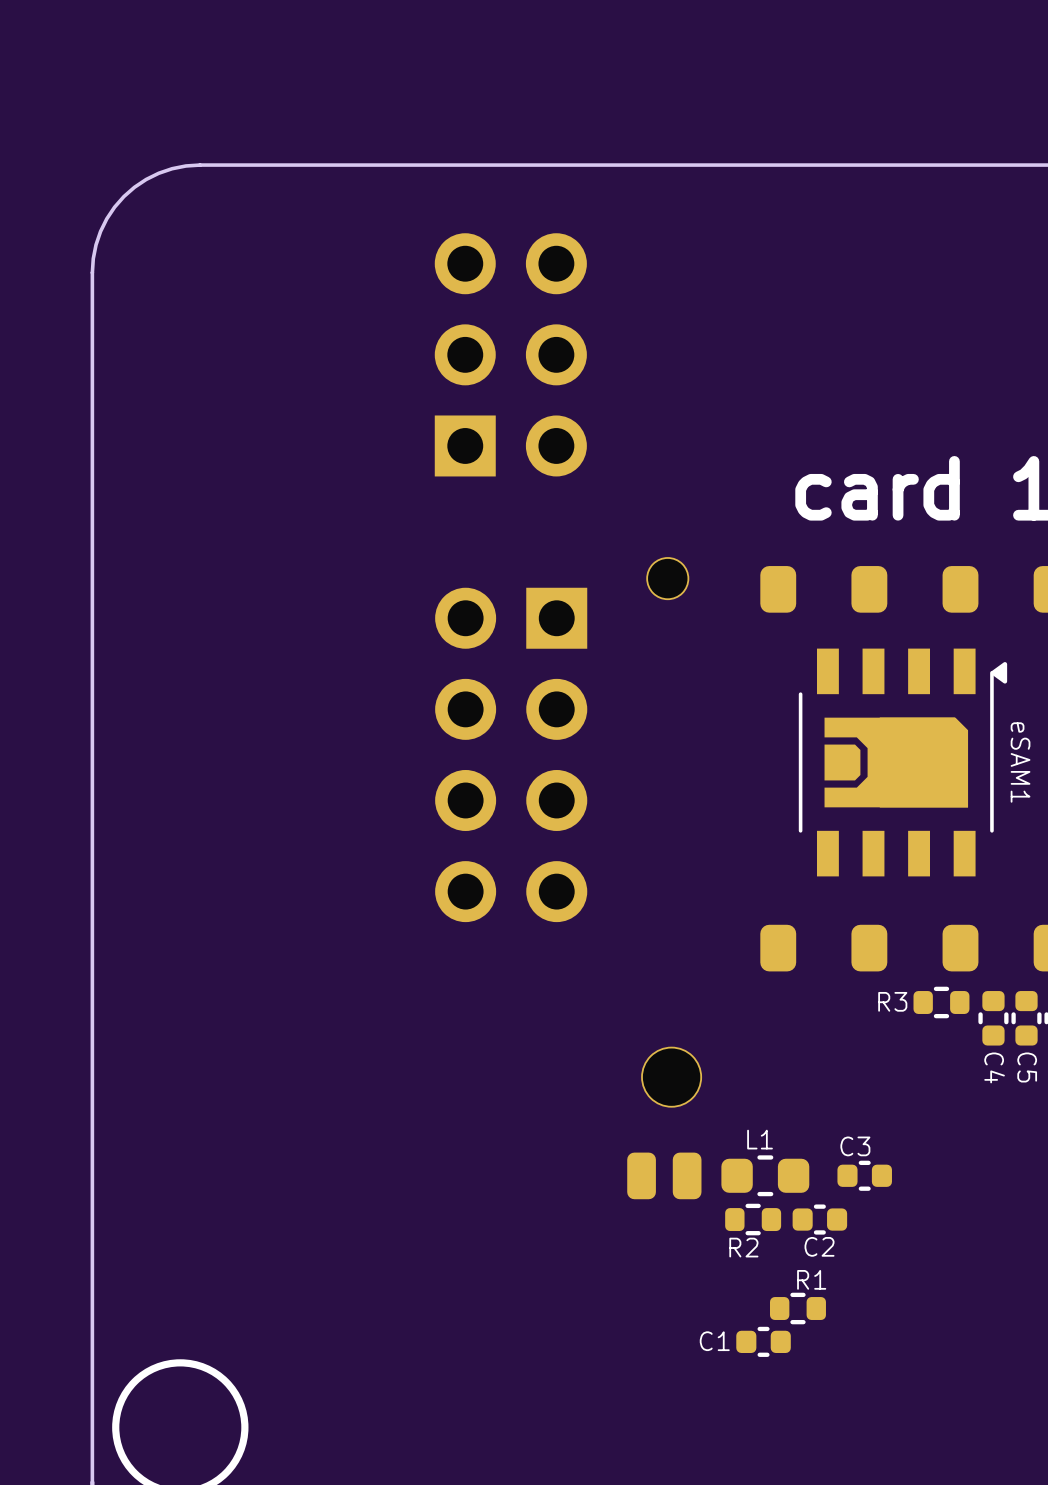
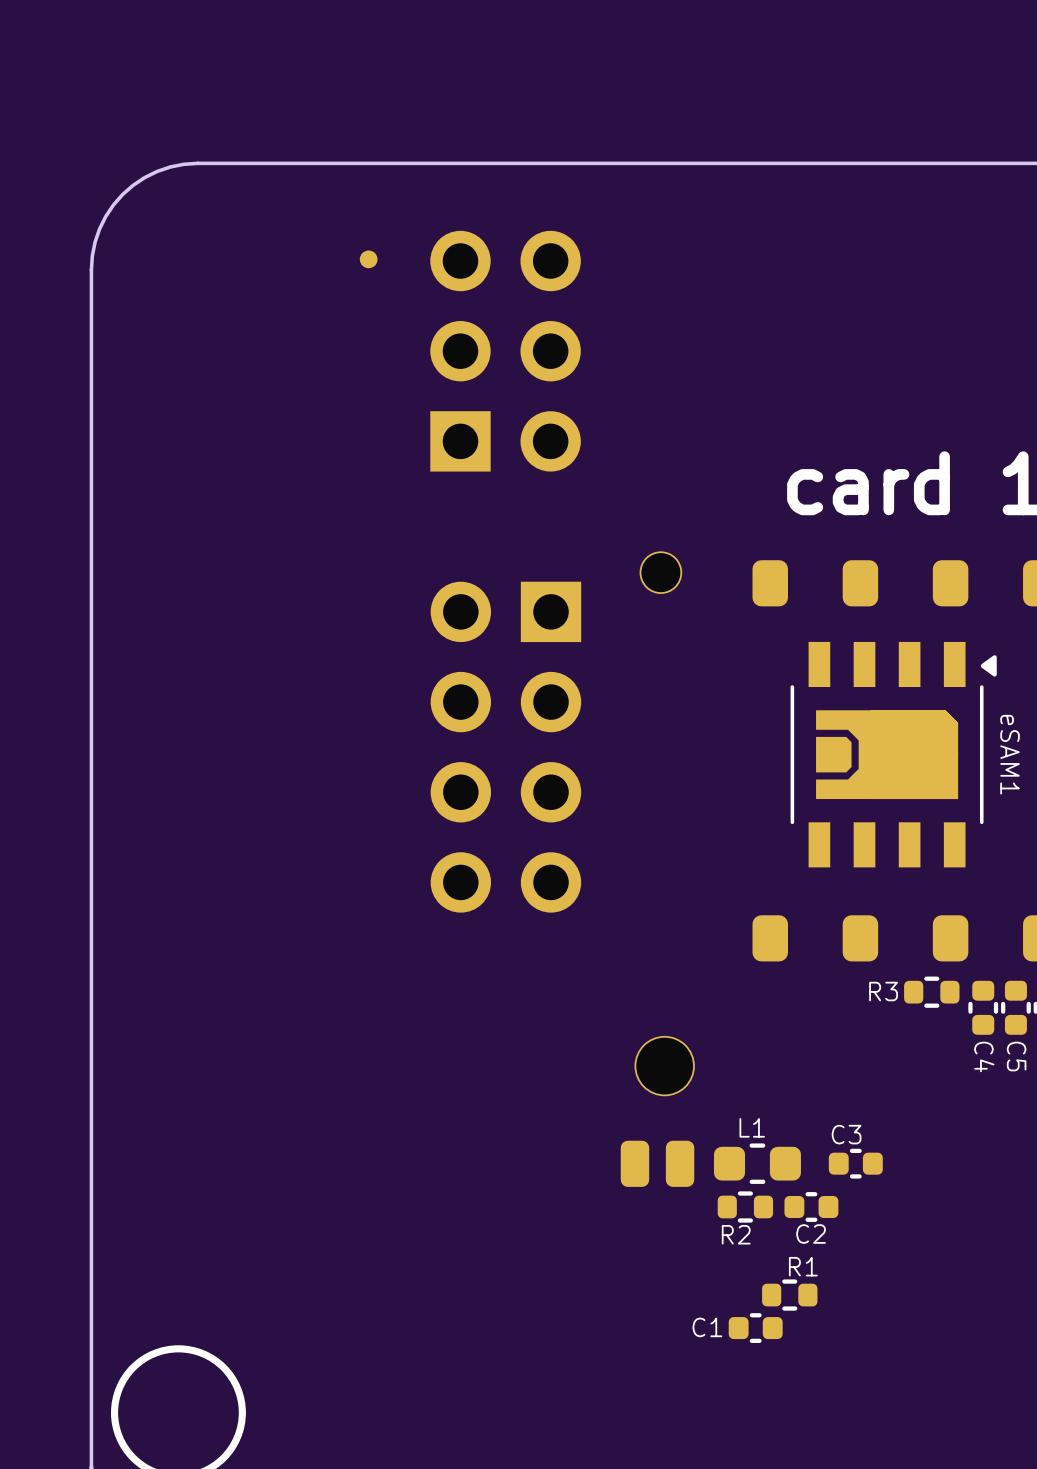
part: none -> (368, 259)
eSAM1 footprint: [798, 648, 1008, 877] -> [790, 641, 997, 868]

